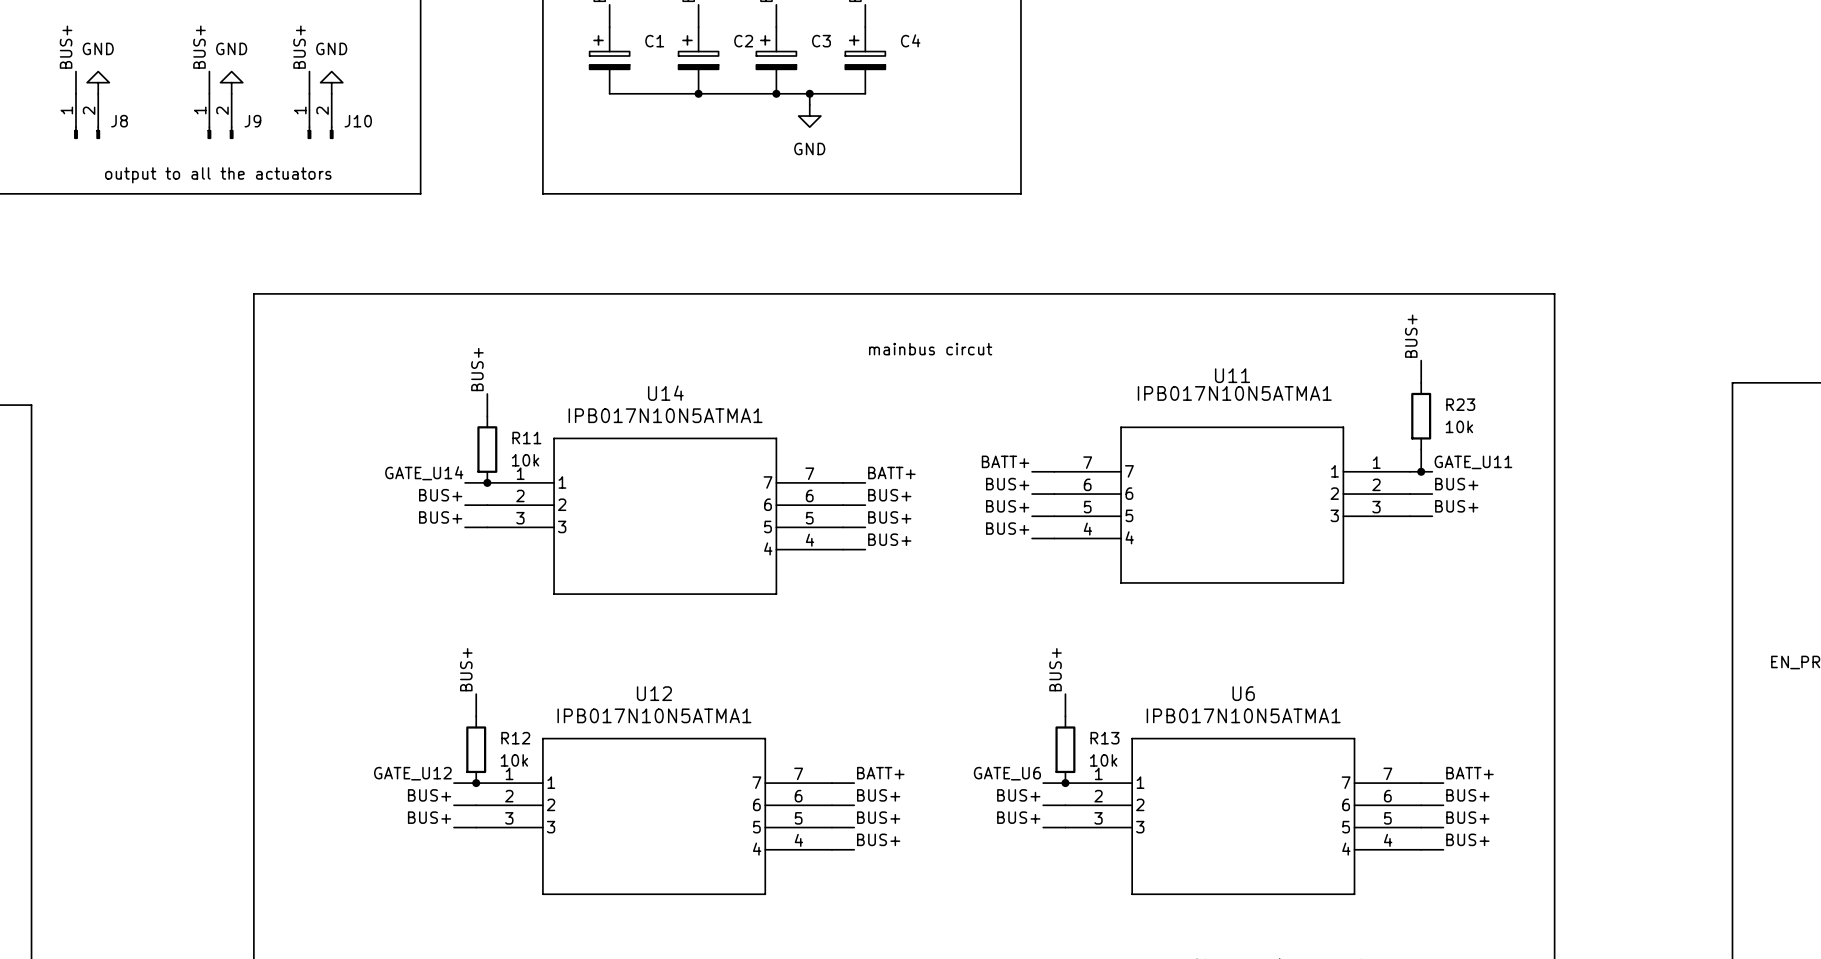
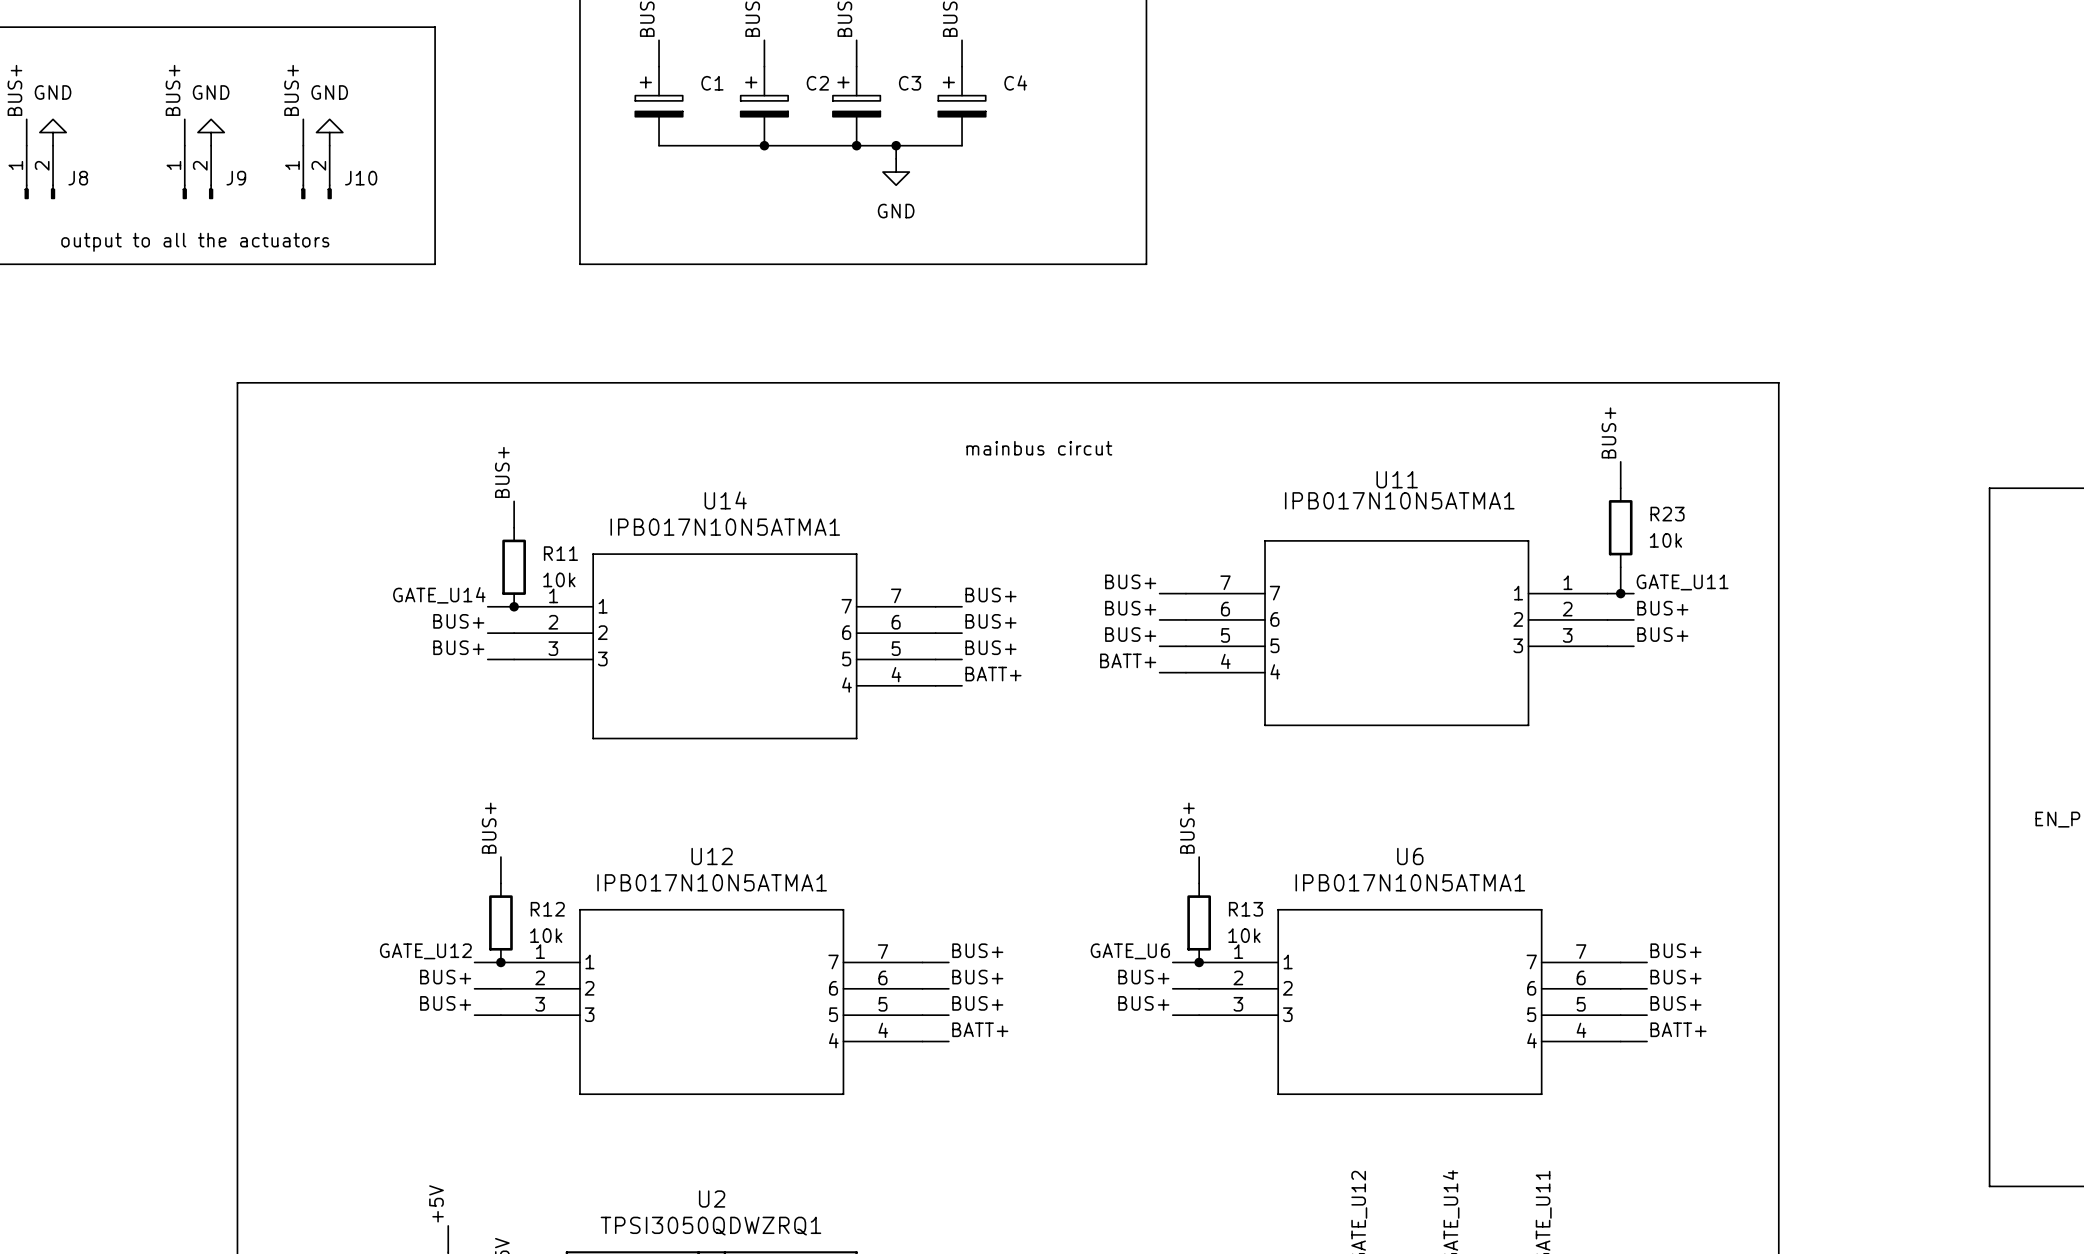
label: BATT+ (1005, 461) -> BUS+ (1130, 581)
label: BATT+ (891, 472) -> BUS+ (990, 595)
label: BUS+ (1007, 528) -> BATT+ (1128, 660)
label: BUS+ (889, 539) -> BATT+ (993, 674)
label: BATT+ (880, 773) -> BUS+ (977, 950)
label: BATT+ (1469, 773) -> BUS+ (1676, 950)
label: BUS+ (878, 839) -> BATT+ (980, 1029)
label: BUS+ (1467, 839) -> BATT+ (1678, 1029)

